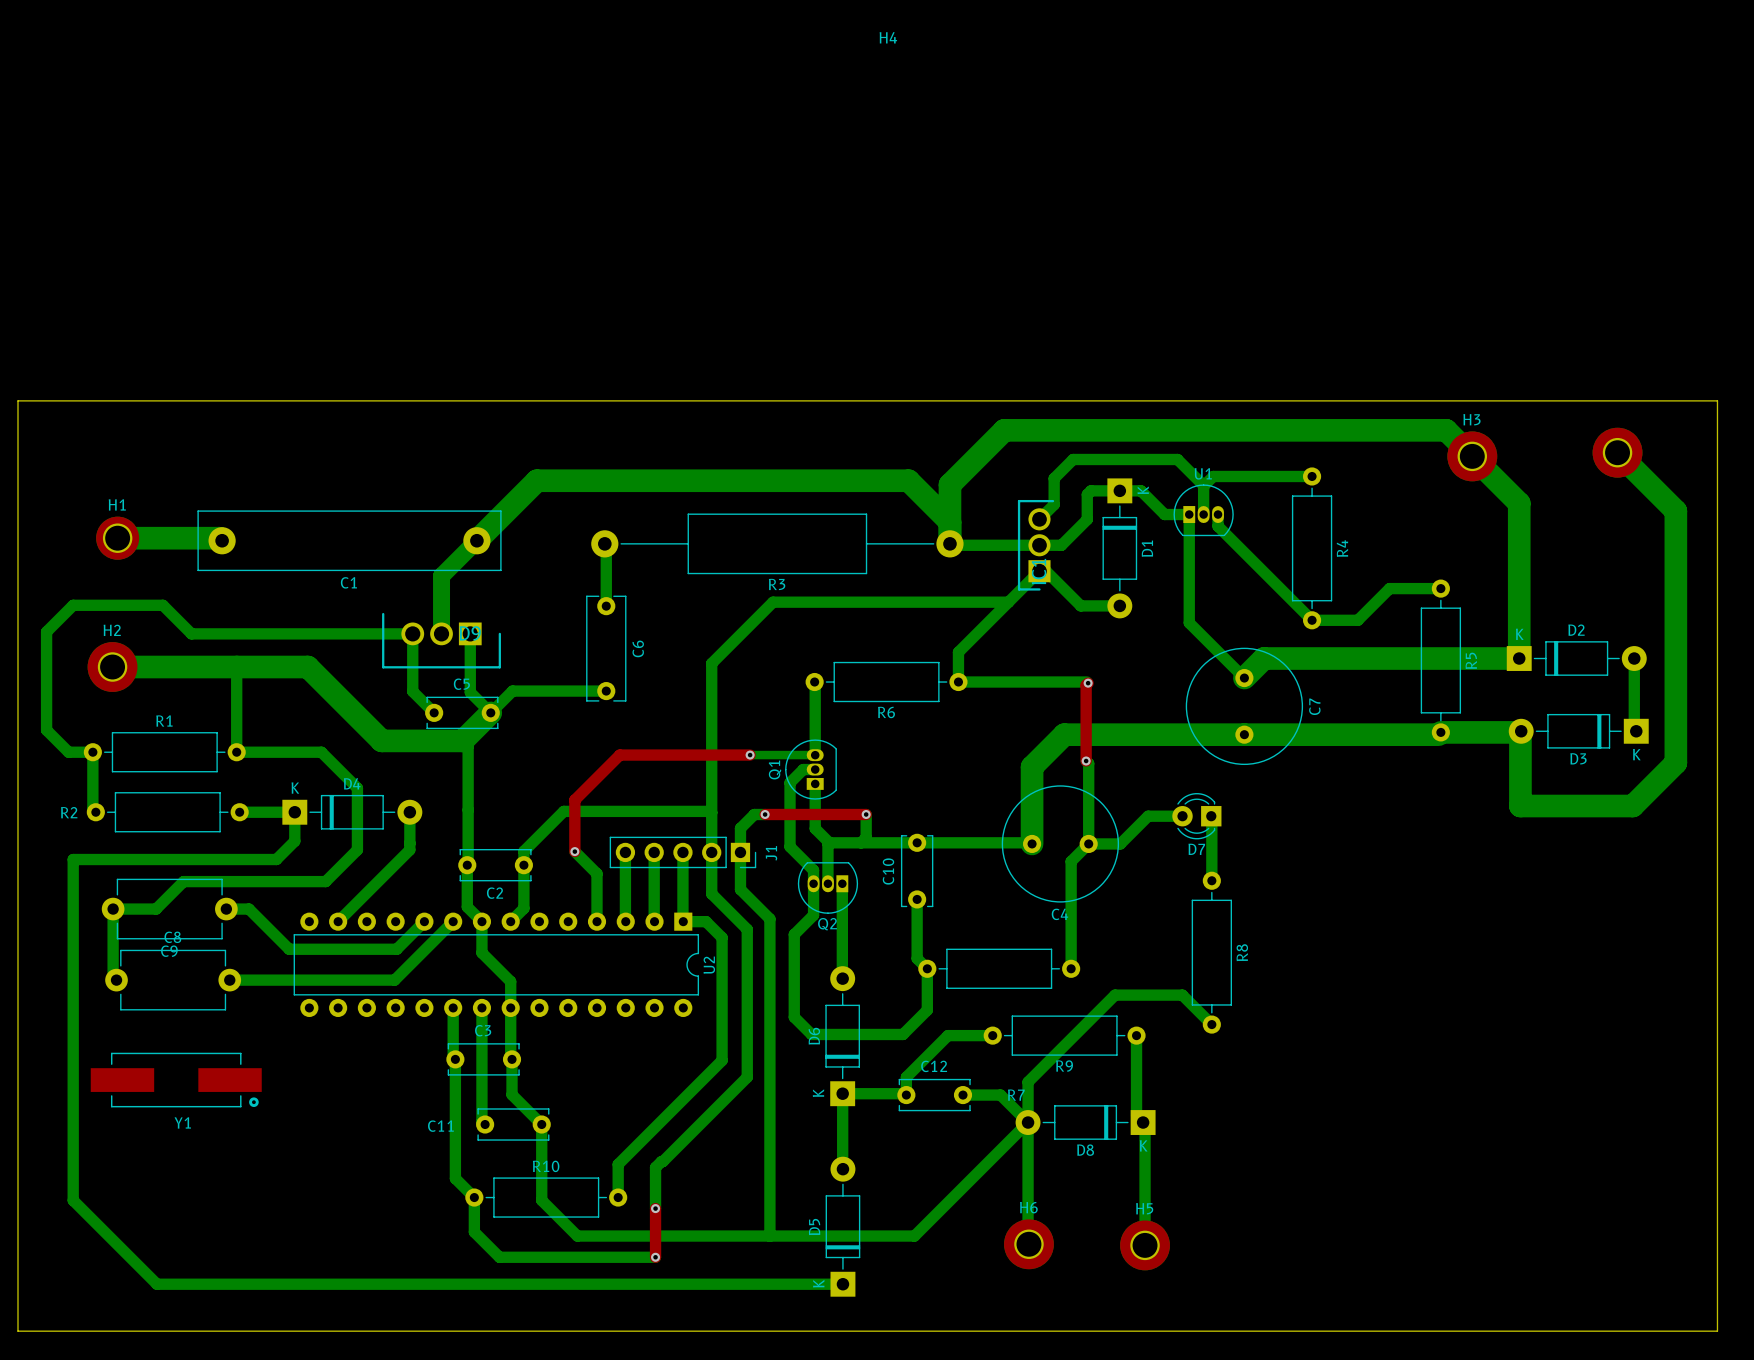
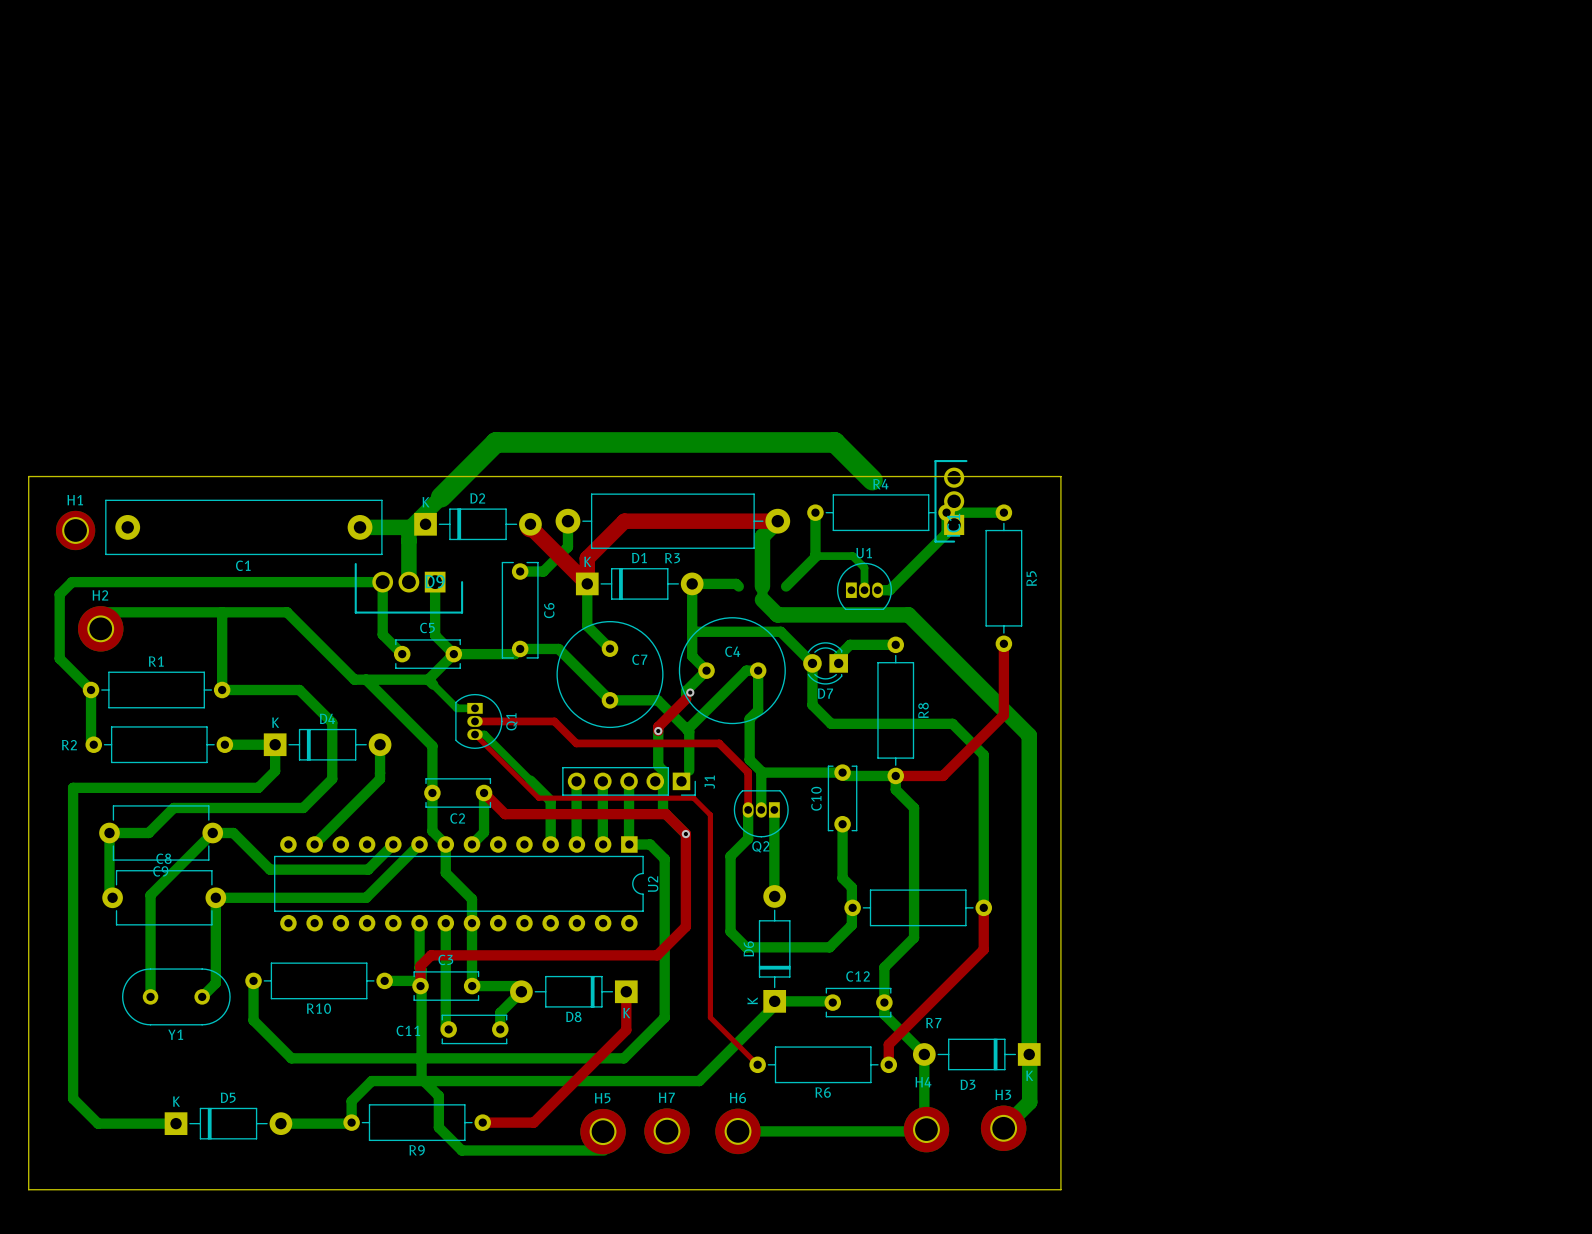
H4 name position: H4 (888, 37) -> H4 (923, 1082)
board edge: (17, 400) (1717, 400) (1717, 1331) (17, 1331) (17, 400) -> (28, 476) (28, 1189) (1060, 1189) (1060, 476) (28, 476)
bottom track: (1617, 452) (1675, 511) (1675, 762) (1632, 806) (1520, 806) (1520, 732) -> none
H4 position: (1617, 452) -> (926, 1129)
H3 position: (1472, 456) -> (1003, 1128)
bottom track: (1312, 476) (1213, 476) (1203, 486) (1203, 514) -> none
bottom track: (1203, 485) (1177, 459) (1073, 459) (1054, 478) (1054, 504) (1039, 519) -> none
U1 position: (1203, 510) -> (864, 586)
R3 footprint: [591, 513, 964, 575] -> [555, 493, 791, 549]
bottom track: (1218, 514) (1218, 526) (1312, 620) (1357, 620) (1389, 588) (1440, 588) -> none
bottom track: (117, 538) (219, 538) (222, 540) -> none
H1 position: (117, 538) -> (75, 530)
C1 position: (349, 540) -> (243, 527)
bottom track: (604, 543) (606, 606) -> none
bottom track: (951, 545) (1061, 545) (1087, 519) (1087, 494) (1091, 490) (1141, 490) (1164, 514) (1189, 514) (1189, 622) (1244, 678) (1263, 658) (1519, 658) (1519, 503) (1446, 430) (1004, 430) (949, 484) (949, 543) (951, 545) -> none
D1 rotation: 0° (1119, 548) -> 90° counterclockwise (639, 583)
D1 position: (1119, 548) -> (639, 583)
R4 rotation: 0° (1312, 548) -> 90° clockwise (881, 512)
R4 position: (1312, 548) -> (881, 512)
R4 name position: R4 (1342, 548) -> R4 (880, 484)
bottom track: none -> (815, 512) (816, 556)
bottom track: none -> (1003, 512) (946, 512) (946, 533) (889, 590) (877, 590)
bottom track: none -> (567, 521) (567, 546) (543, 571) (520, 571)
top track: none -> (777, 521) (624, 521) (587, 558) (587, 583) (530, 527) (530, 524)
bottom track: none -> (777, 521) (762, 536) (762, 599) (777, 614) (908, 614) (1029, 735) (1029, 1102) (1003, 1128)
bottom track: none -> (360, 527) (422, 527)
bottom track: (1008, 602) (773, 602) (711, 663) (711, 893) (747, 929) (747, 1077) (655, 1167) (655, 1208) -> none
bottom track: none -> (816, 556) (786, 586)
bottom track: none -> (816, 556) (852, 556) (864, 567) (864, 590)
bottom track: (1119, 605) (1080, 605) (1046, 571) (1039, 571) (958, 652) (958, 682) (1086, 682) -> none
bottom track: (191, 633) (162, 605) (73, 605) (46, 631) (46, 730) (68, 752) (92, 752) -> (181, 582) (72, 582) (59, 594) (59, 658) (91, 690)
bottom track: none -> (587, 583) (587, 625) (609, 648)
bottom track: none -> (738, 586) (736, 583) (692, 583) (692, 656) (706, 670) (686, 691) (686, 699)
C6 position: (606, 648) -> (520, 610)
D2 position: (1576, 658) -> (477, 524)
bottom track: (1634, 658) (1634, 729) (1636, 731) -> none
R5 position: (1440, 660) -> (1003, 578)
bottom track width: thick (112, 667) (307, 667) (381, 740) (462, 740) (490, 712) -> thin (108, 612) (287, 612) (354, 679) (428, 679) (453, 654)
H2 position: (112, 667) -> (100, 628)
bottom track: (814, 682) (815, 755) -> none
R6 position: (886, 682) -> (823, 1064)
top track: (1088, 683) (1086, 685) (1086, 761) -> none
via: (1088, 683) -> none
bottom track: none -> (692, 631) (780, 631) (812, 663) (812, 705) (831, 723) (952, 723) (983, 755) (983, 907)
bottom track: (606, 691) (512, 691) (490, 712) -> (689, 770) (689, 731) (657, 700) (609, 700) (558, 648) (520, 648) (515, 654) (453, 654)
top track: none -> (1003, 643) (1003, 715) (942, 775) (895, 775)
bottom track: none -> (895, 644) (850, 644) (838, 656) (838, 663)
C7 position: (1244, 706) -> (609, 674)
C7 name rotation: 0° (1314, 706) -> 90° clockwise (639, 659)
C7 name position: C7 (1314, 706) -> C7 (639, 659)
bottom track: (1521, 731) (1440, 732) (1438, 734) (1064, 734) (1032, 766) (1032, 843) (917, 842) -> (924, 1127) (924, 1054) (884, 1014) (884, 967) (914, 937) (914, 807) (895, 789) (895, 775) (845, 775) (842, 772)
D3 position: (1578, 731) -> (976, 1054)
bottom track: (468, 746) (467, 865) -> (366, 679) (432, 746) (432, 792)
bottom track: none -> (433, 684) (456, 708) (475, 708)
top track: (750, 755) (619, 755) (574, 800) (574, 851) -> none
bottom track: (750, 755) (815, 755) -> none
D3 name position: D3 (1578, 758) -> D3 (968, 1084)
bottom track: (1086, 761) (1088, 763) (1088, 843) -> none
via: (1086, 761) -> none
top track: none -> (686, 699) (658, 726) (658, 731)
Q1 rotation: 0° (810, 769) -> 180° (478, 721)
Q1 position: (810, 769) -> (478, 721)
bottom track: (815, 769) (803, 769) (790, 782) (790, 846) (813, 870) (813, 883) -> none
bottom track: none -> (749, 718) (758, 710) (758, 670) (746, 670) (687, 729)
top track: none -> (475, 721) (554, 721) (576, 743) (719, 743) (748, 772) (748, 809)
D7 footprint: [1172, 793, 1222, 840] -> [803, 642, 848, 685]
bottom track: none -> (658, 731) (658, 765) (663, 770) (663, 811) (685, 834)
via: none -> (658, 731)
top track: none -> (475, 734) (538, 798) (693, 798) (710, 814) (710, 1017) (757, 1064)
bottom track: none -> (475, 734) (484, 734) (530, 780)
bottom track: (711, 812) (563, 811) (523, 851) (524, 864) -> none
top track: (765, 814) (866, 814) -> none
bottom track: (765, 814) (754, 814) (740, 828) (740, 889) (769, 918) (769, 1236) -> none
via: (765, 814) -> none
bottom track: (866, 814) (866, 837) (861, 842) -> none
via: (866, 814) -> none
bottom track: (1182, 816) (1148, 816) (1120, 843) (1088, 843) -> none
bottom track: (1211, 816) (1211, 880) -> none
C4 position: (1060, 843) -> (732, 670)
bottom track: (1088, 843) (1071, 861) (1071, 968) -> none
via: (574, 851) -> none
top track: none -> (484, 792) (505, 814) (666, 814) (685, 834) (685, 926) (657, 955) (431, 955) (420, 965) (420, 986)
bottom track: none -> (212, 833) (150, 895) (150, 996)
via: none -> (685, 834)
C4 name position: C4 (1059, 914) -> C4 (732, 651)
R8 position: (1211, 952) -> (895, 710)
R7 position: (999, 968) -> (918, 907)
bottom track: none -> (215, 897) (215, 983) (202, 996)
top track: none -> (983, 907) (983, 949) (888, 1044) (888, 1064)
bottom track: (1211, 1024) (1182, 995) (1115, 995) (1028, 1082) (1028, 1244) -> none
bottom track: (992, 1035) (947, 1035) (906, 1077) (906, 1095) -> none
R9 position: (1064, 1035) -> (417, 1122)
bottom track: (1136, 1035) (1136, 1115) (1145, 1124) (1145, 1245) -> none
Y1 footprint: [90, 1052, 262, 1108] -> [122, 968, 231, 1026]
bottom track: (510, 1058) (512, 1094) (541, 1124) (541, 1200) (577, 1236) (914, 1236) (1028, 1122) (1000, 1095) (963, 1095) -> (472, 968) (472, 986) (515, 986) (521, 991) (500, 1012) (500, 1029)
C3 position: (483, 1059) -> (446, 986)
bottom track: (722, 1060) (618, 1164) (618, 1197) -> (664, 971) (664, 1017) (623, 1058) (291, 1058) (253, 1020) (253, 980)
bottom track: none -> (384, 980) (415, 980) (420, 986)
top track: none -> (626, 991) (626, 1030) (533, 1122) (482, 1122)
bottom track: (842, 1098) (842, 1169) -> (774, 1005) (699, 1081) (371, 1081) (351, 1101) (350, 1123) (280, 1123)
D8 position: (1085, 1122) -> (573, 991)
R10 name position: R10 (546, 1166) -> R10 (318, 1008)
R10 position: (546, 1197) -> (319, 980)
top track: (655, 1208) (655, 1257) -> none
via: (655, 1208) -> none
D5 rotation: 0° (842, 1226) -> 90° clockwise (228, 1123)
D5 position: (842, 1226) -> (228, 1123)
bottom track: (100, 1227) (157, 1284) (842, 1284) -> (98, 1123) (176, 1123)
bottom track: none -> (922, 1125) (926, 1129) (924, 1131) (738, 1131)
H7: none -> (667, 1131)
H6 position: (1028, 1244) -> (738, 1131)
H5 position: (1145, 1245) -> (603, 1131)
via: (655, 1257) -> none

